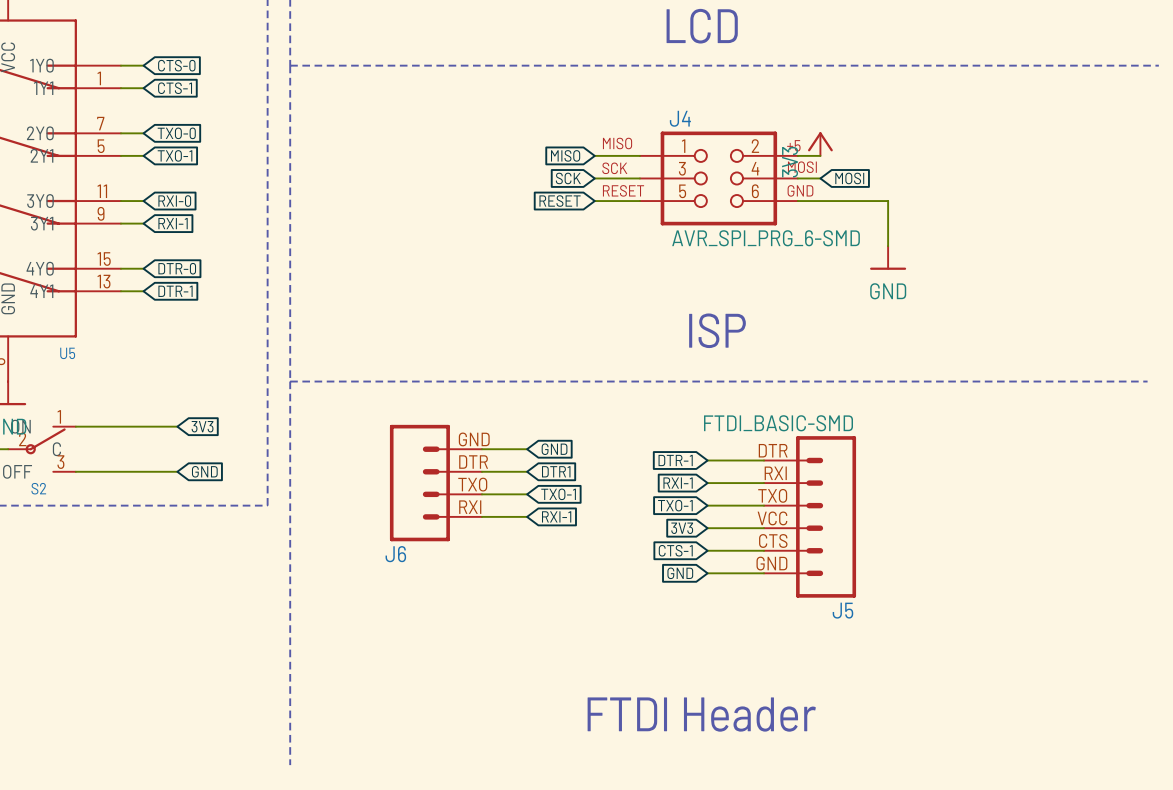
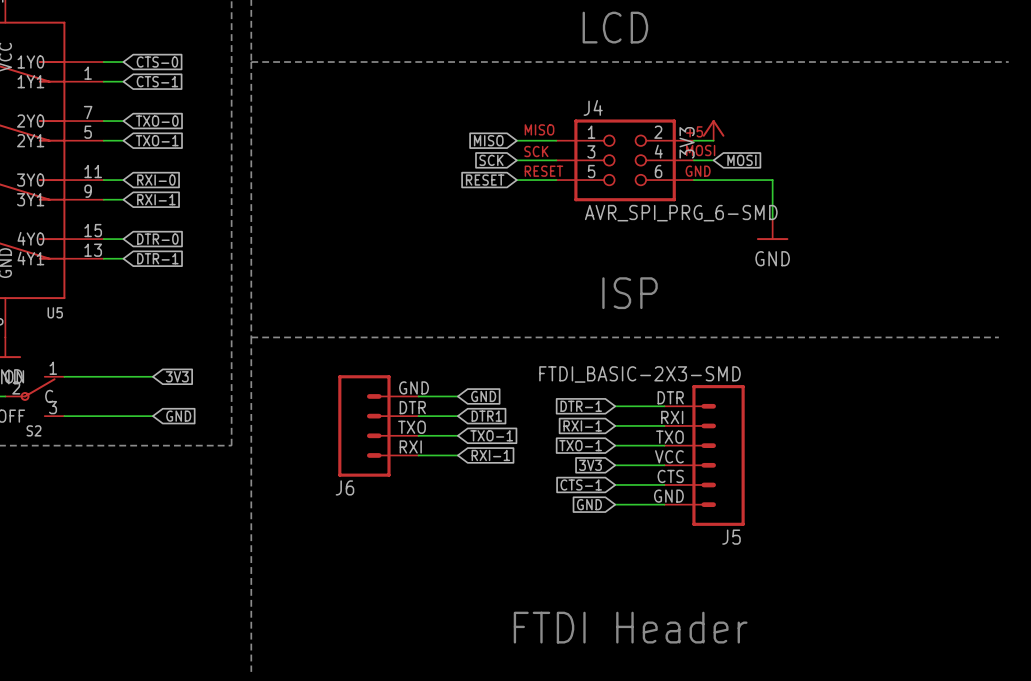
J5 value: FTDI_BASIC-SMD (778, 423) -> FTDI_BASIC-2X3-SMD (640, 374)

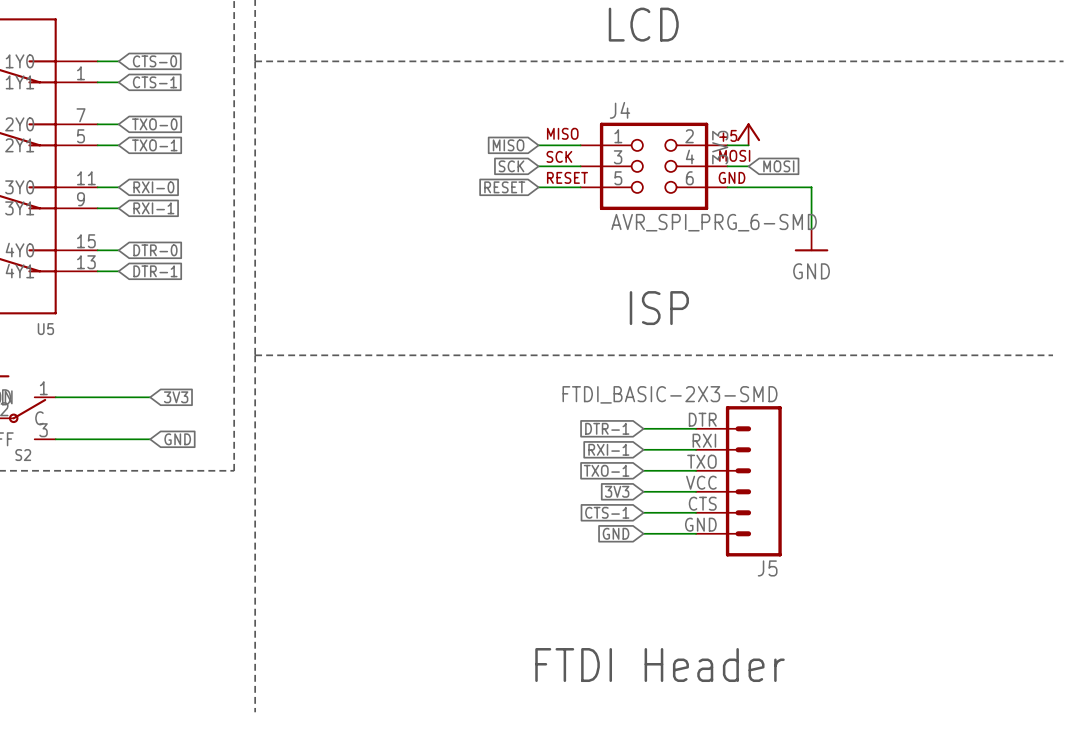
wire: (418, 396) (457, 396) -> none
global label: GND (483, 396) -> none
wire: (418, 416) (457, 416) -> none
global label: DTR1 (486, 416) -> none
J6: (378, 425) -> none
wire: (418, 435) (457, 435) -> none
global label: TXO-1 (491, 435) -> none
wire: (418, 455) (457, 455) -> none
global label: RXI-1 (490, 455) -> none

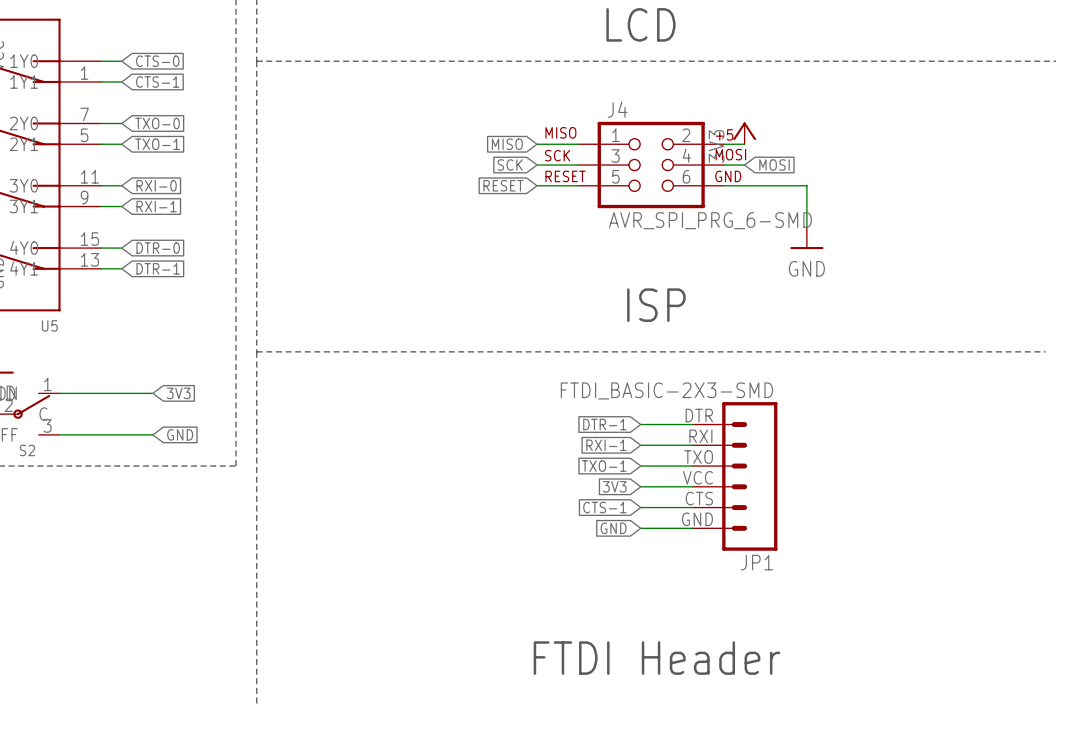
J5 name: J5 (767, 568) -> JP1 (756, 562)

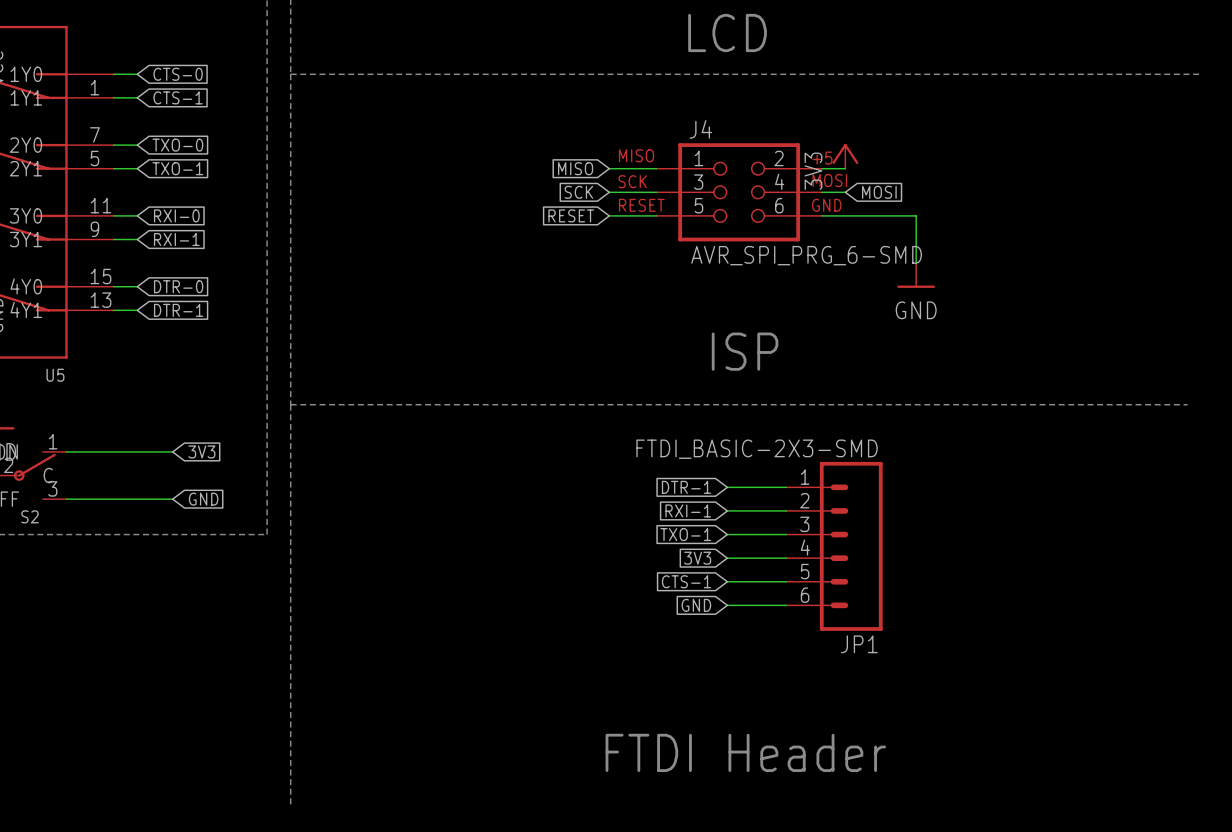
JP1 pin number: DTR (699, 415) -> 1 (805, 477)
JP1 pin number: RXI (700, 436) -> 2 (804, 500)
JP1 pin number: TXO (698, 457) -> 3 (804, 524)
JP1 pin number: VCC (697, 477) -> 4 (805, 547)
JP1 pin number: CTS (699, 498) -> 5 (805, 571)
JP1 pin number: GND (697, 519) -> 6 (805, 595)

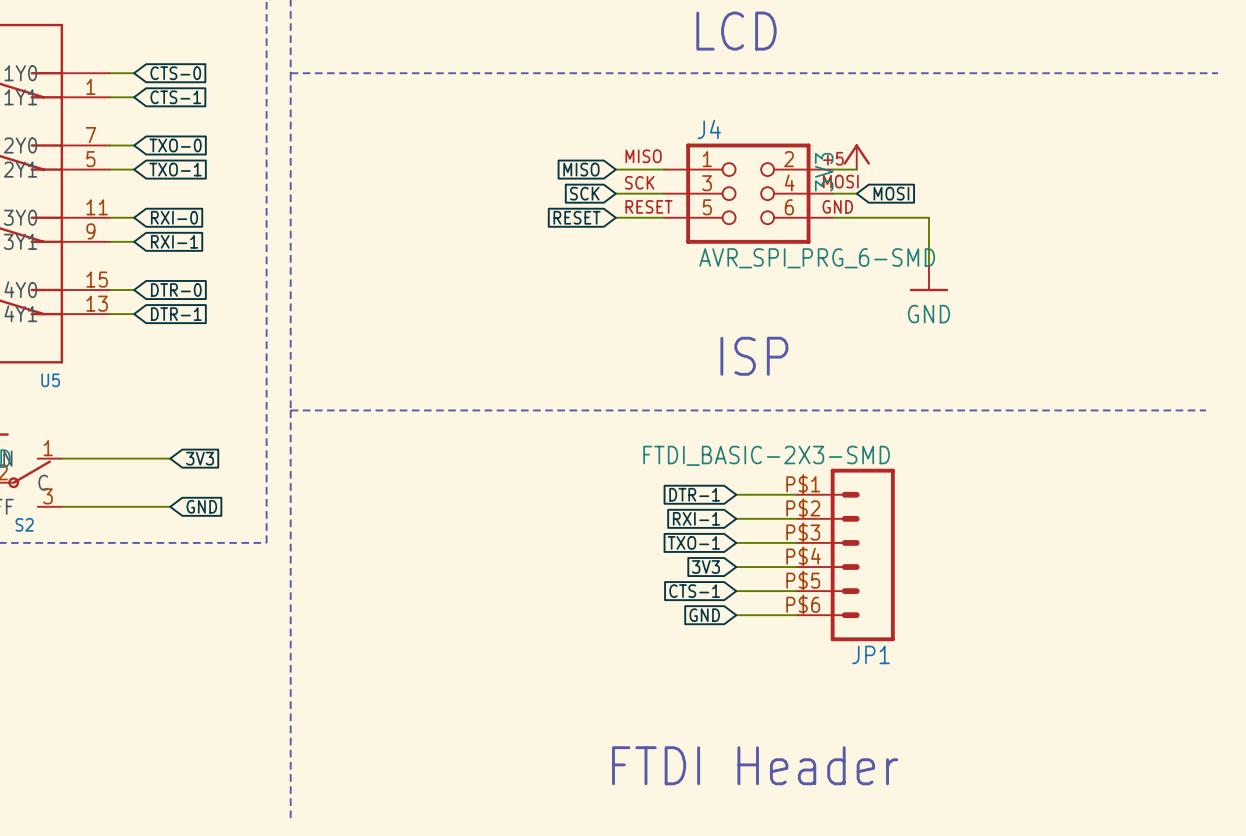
JP1 pin number: 1 (805, 477) -> P$1 (803, 484)
JP1 pin number: 2 (804, 500) -> P$2 (803, 508)
JP1 pin number: 3 (804, 524) -> P$3 (803, 532)
JP1 pin number: 4 (805, 547) -> P$4 (803, 556)
JP1 pin number: 5 (805, 571) -> P$5 (803, 580)
JP1 pin number: 6 (805, 595) -> P$6 (803, 604)

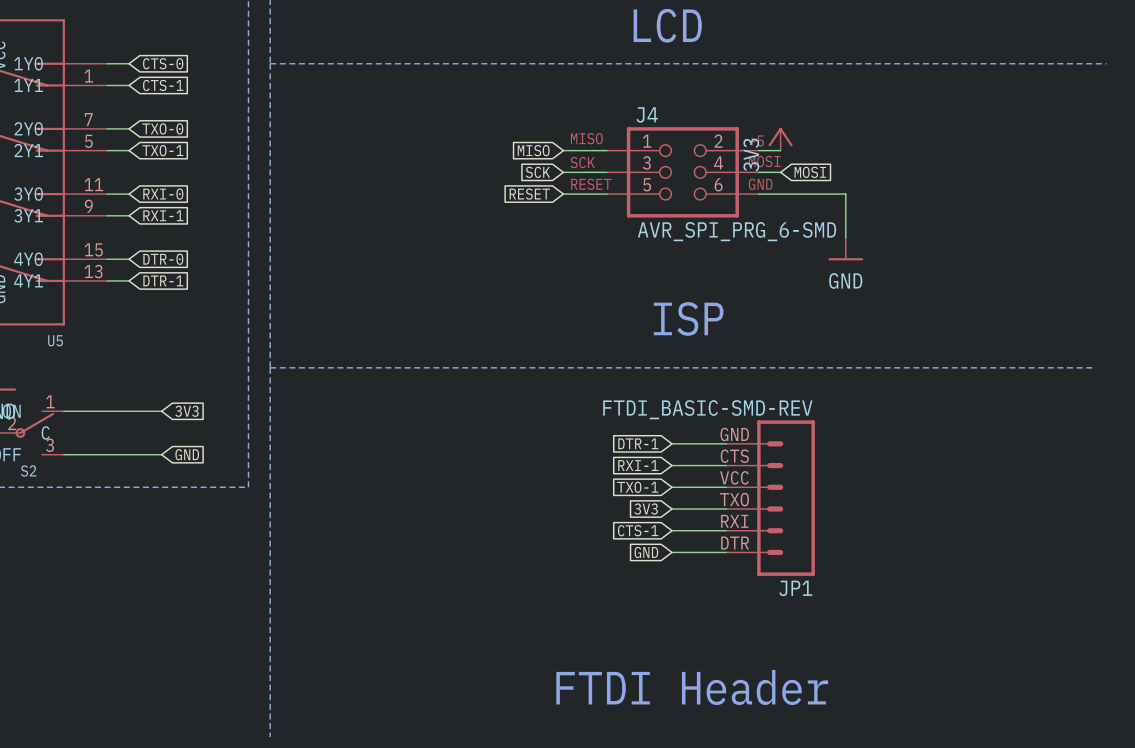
JP1 value: FTDI_BASIC-2X3-SMD (766, 455) -> FTDI_BASIC-SMD-REV (707, 409)
JP1 pin number: P$1 (803, 484) -> GND (734, 434)
JP1 pin number: P$2 (803, 508) -> CTS (734, 456)
JP1 pin number: P$3 (803, 532) -> VCC (734, 477)
JP1 pin number: P$4 (803, 556) -> TXO (734, 499)
JP1 pin number: P$5 (803, 580) -> RXI (734, 521)
JP1 pin number: P$6 (803, 604) -> DTR (735, 543)

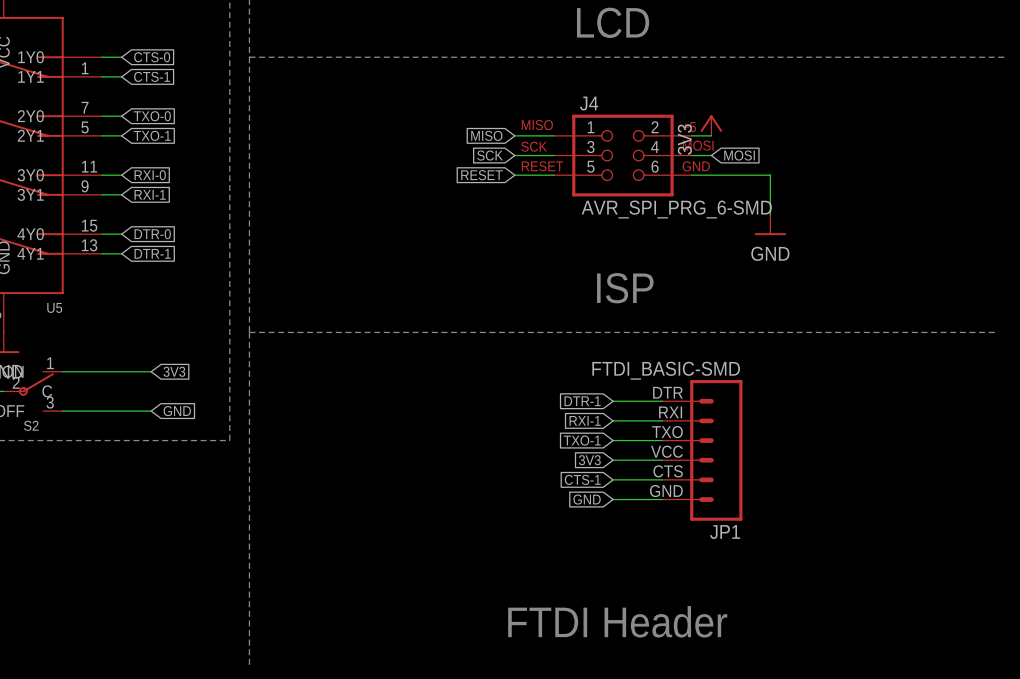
JP1 value: FTDI_BASIC-SMD-REV (707, 409) -> FTDI_BASIC-SMD (666, 370)
JP1 flip: as is (786, 498) -> up-down (716, 450)

